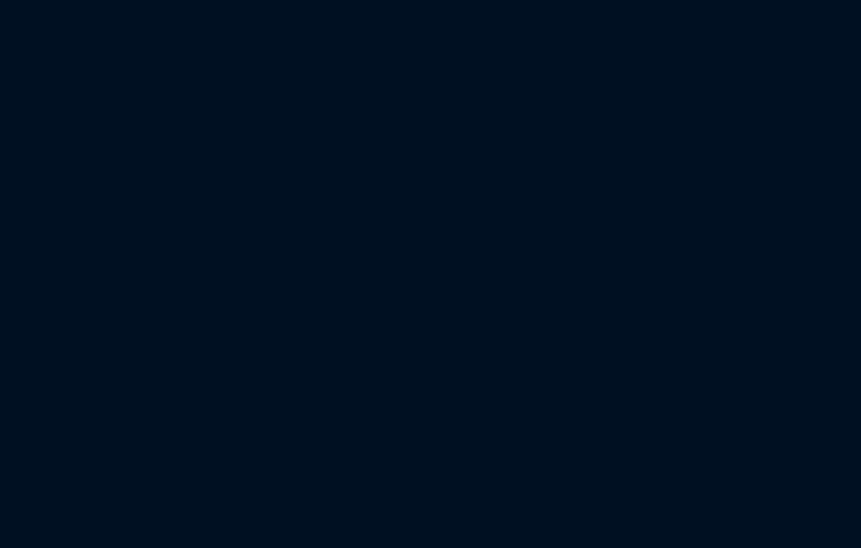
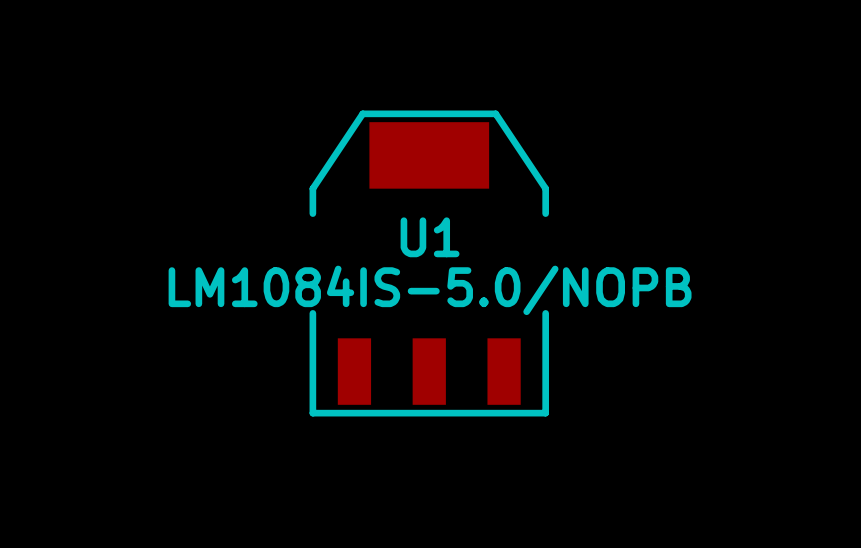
U1: none -> LM1084IS-5.0/NOPB (429, 263)

